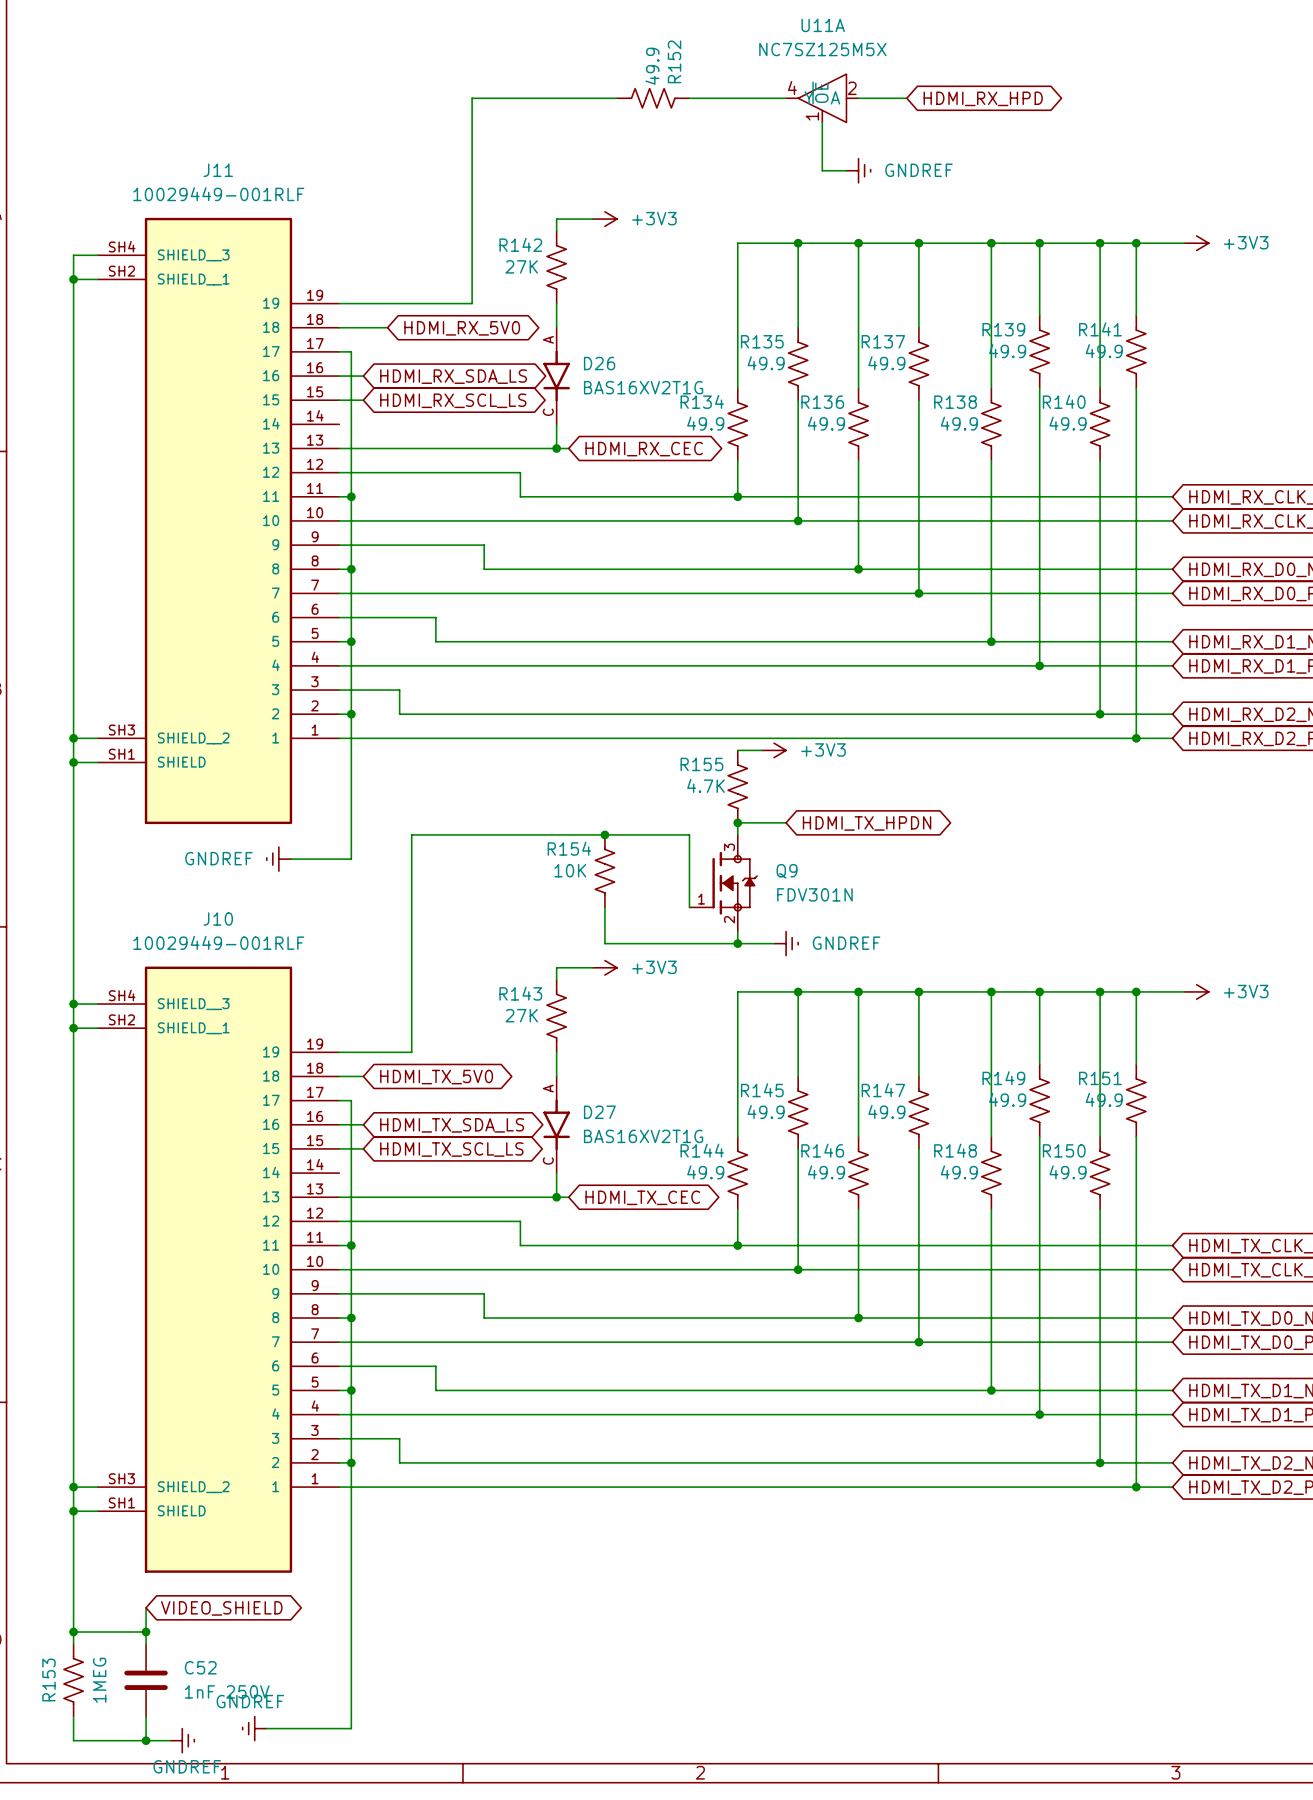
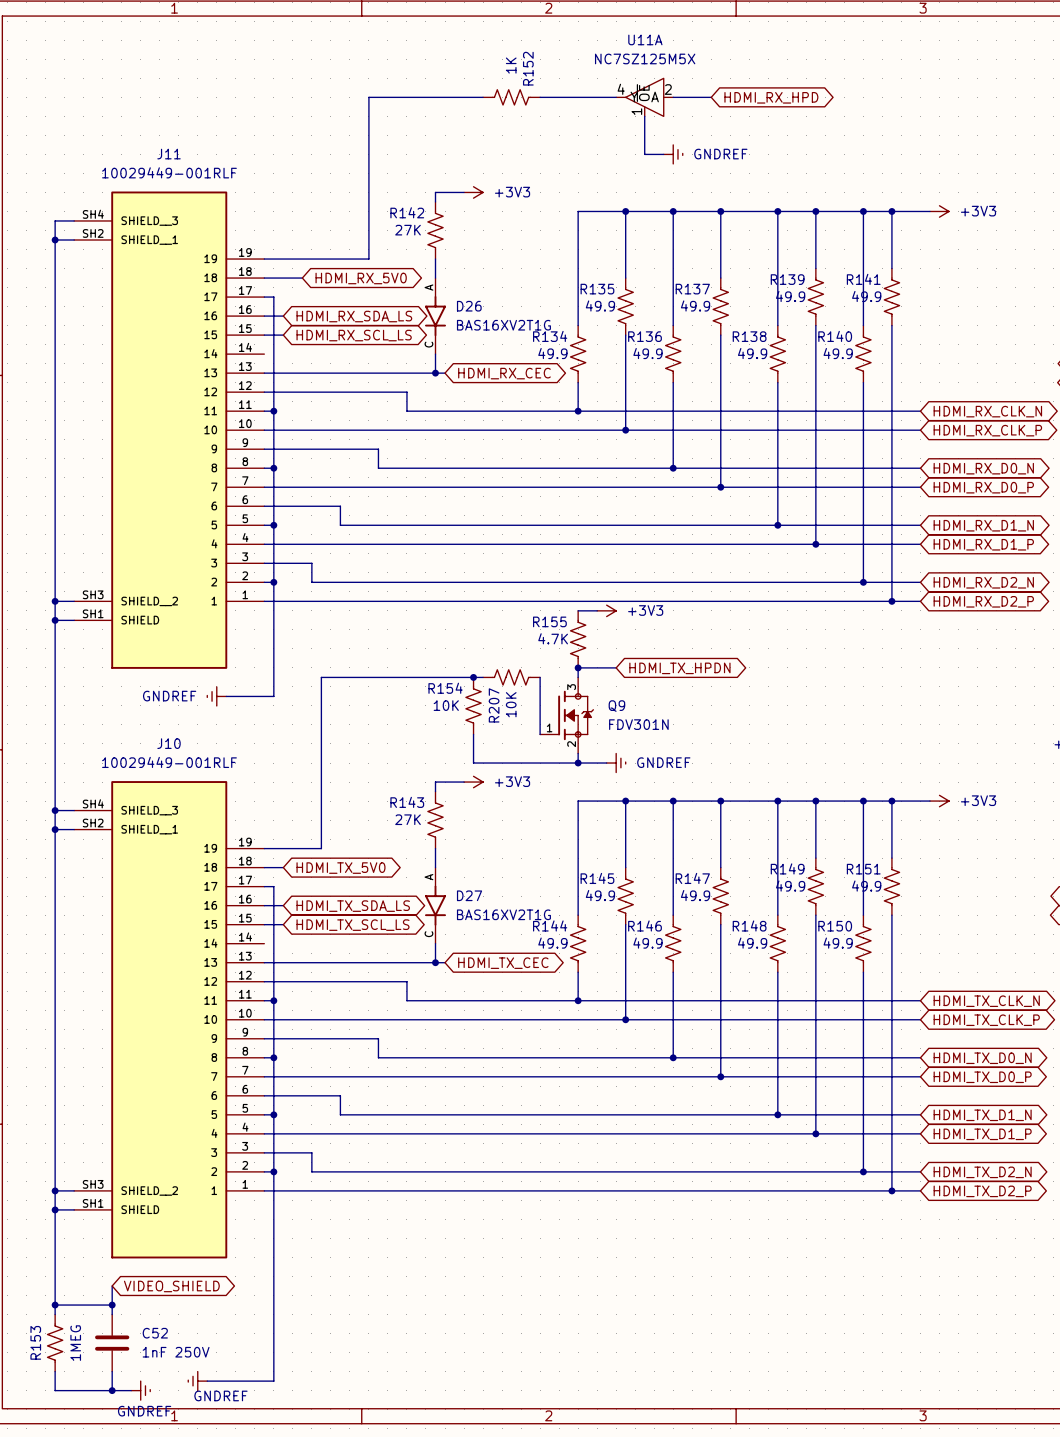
R152 value: 49.9 (652, 66) -> 1K (511, 65)
R207: none -> 10K (511, 677)
power symbol text position: GNDREF (250, 1701) -> GNDREF (220, 1395)

